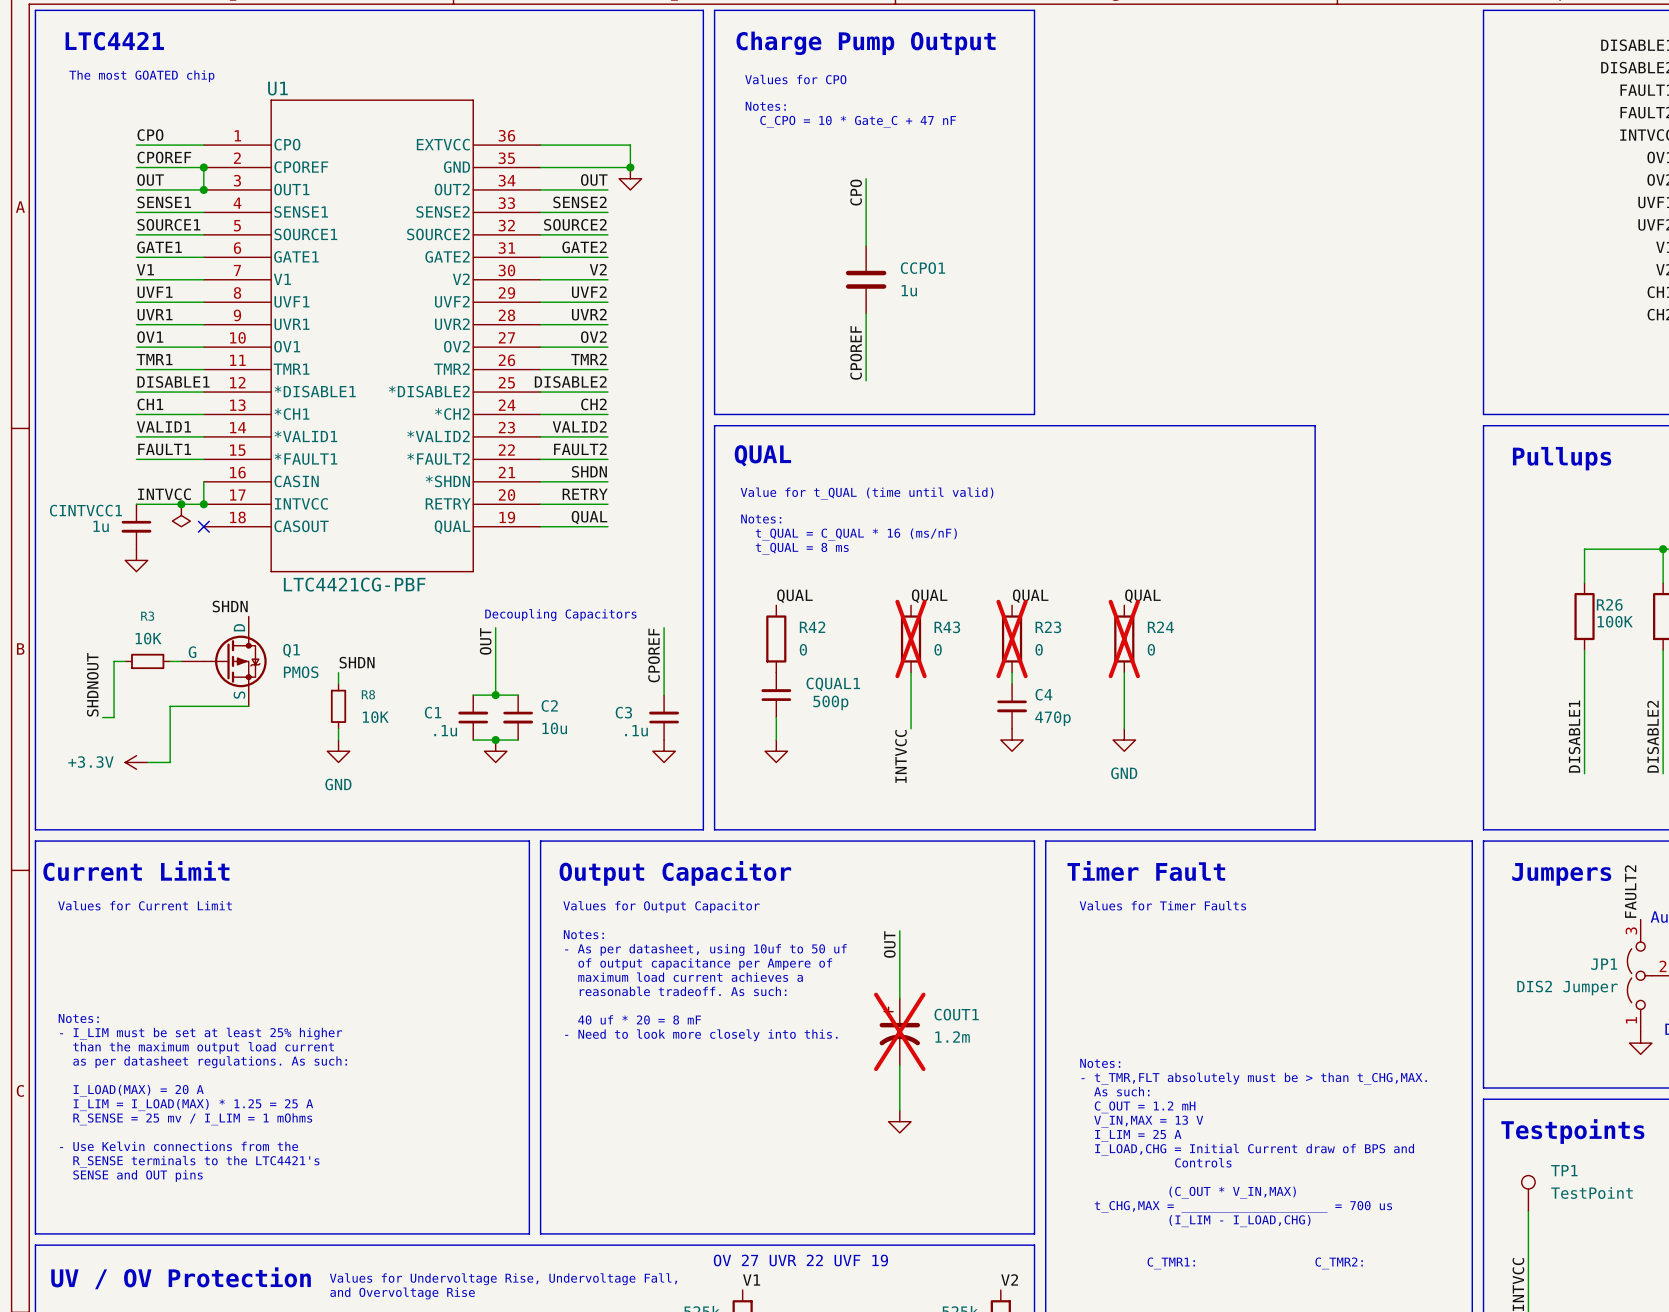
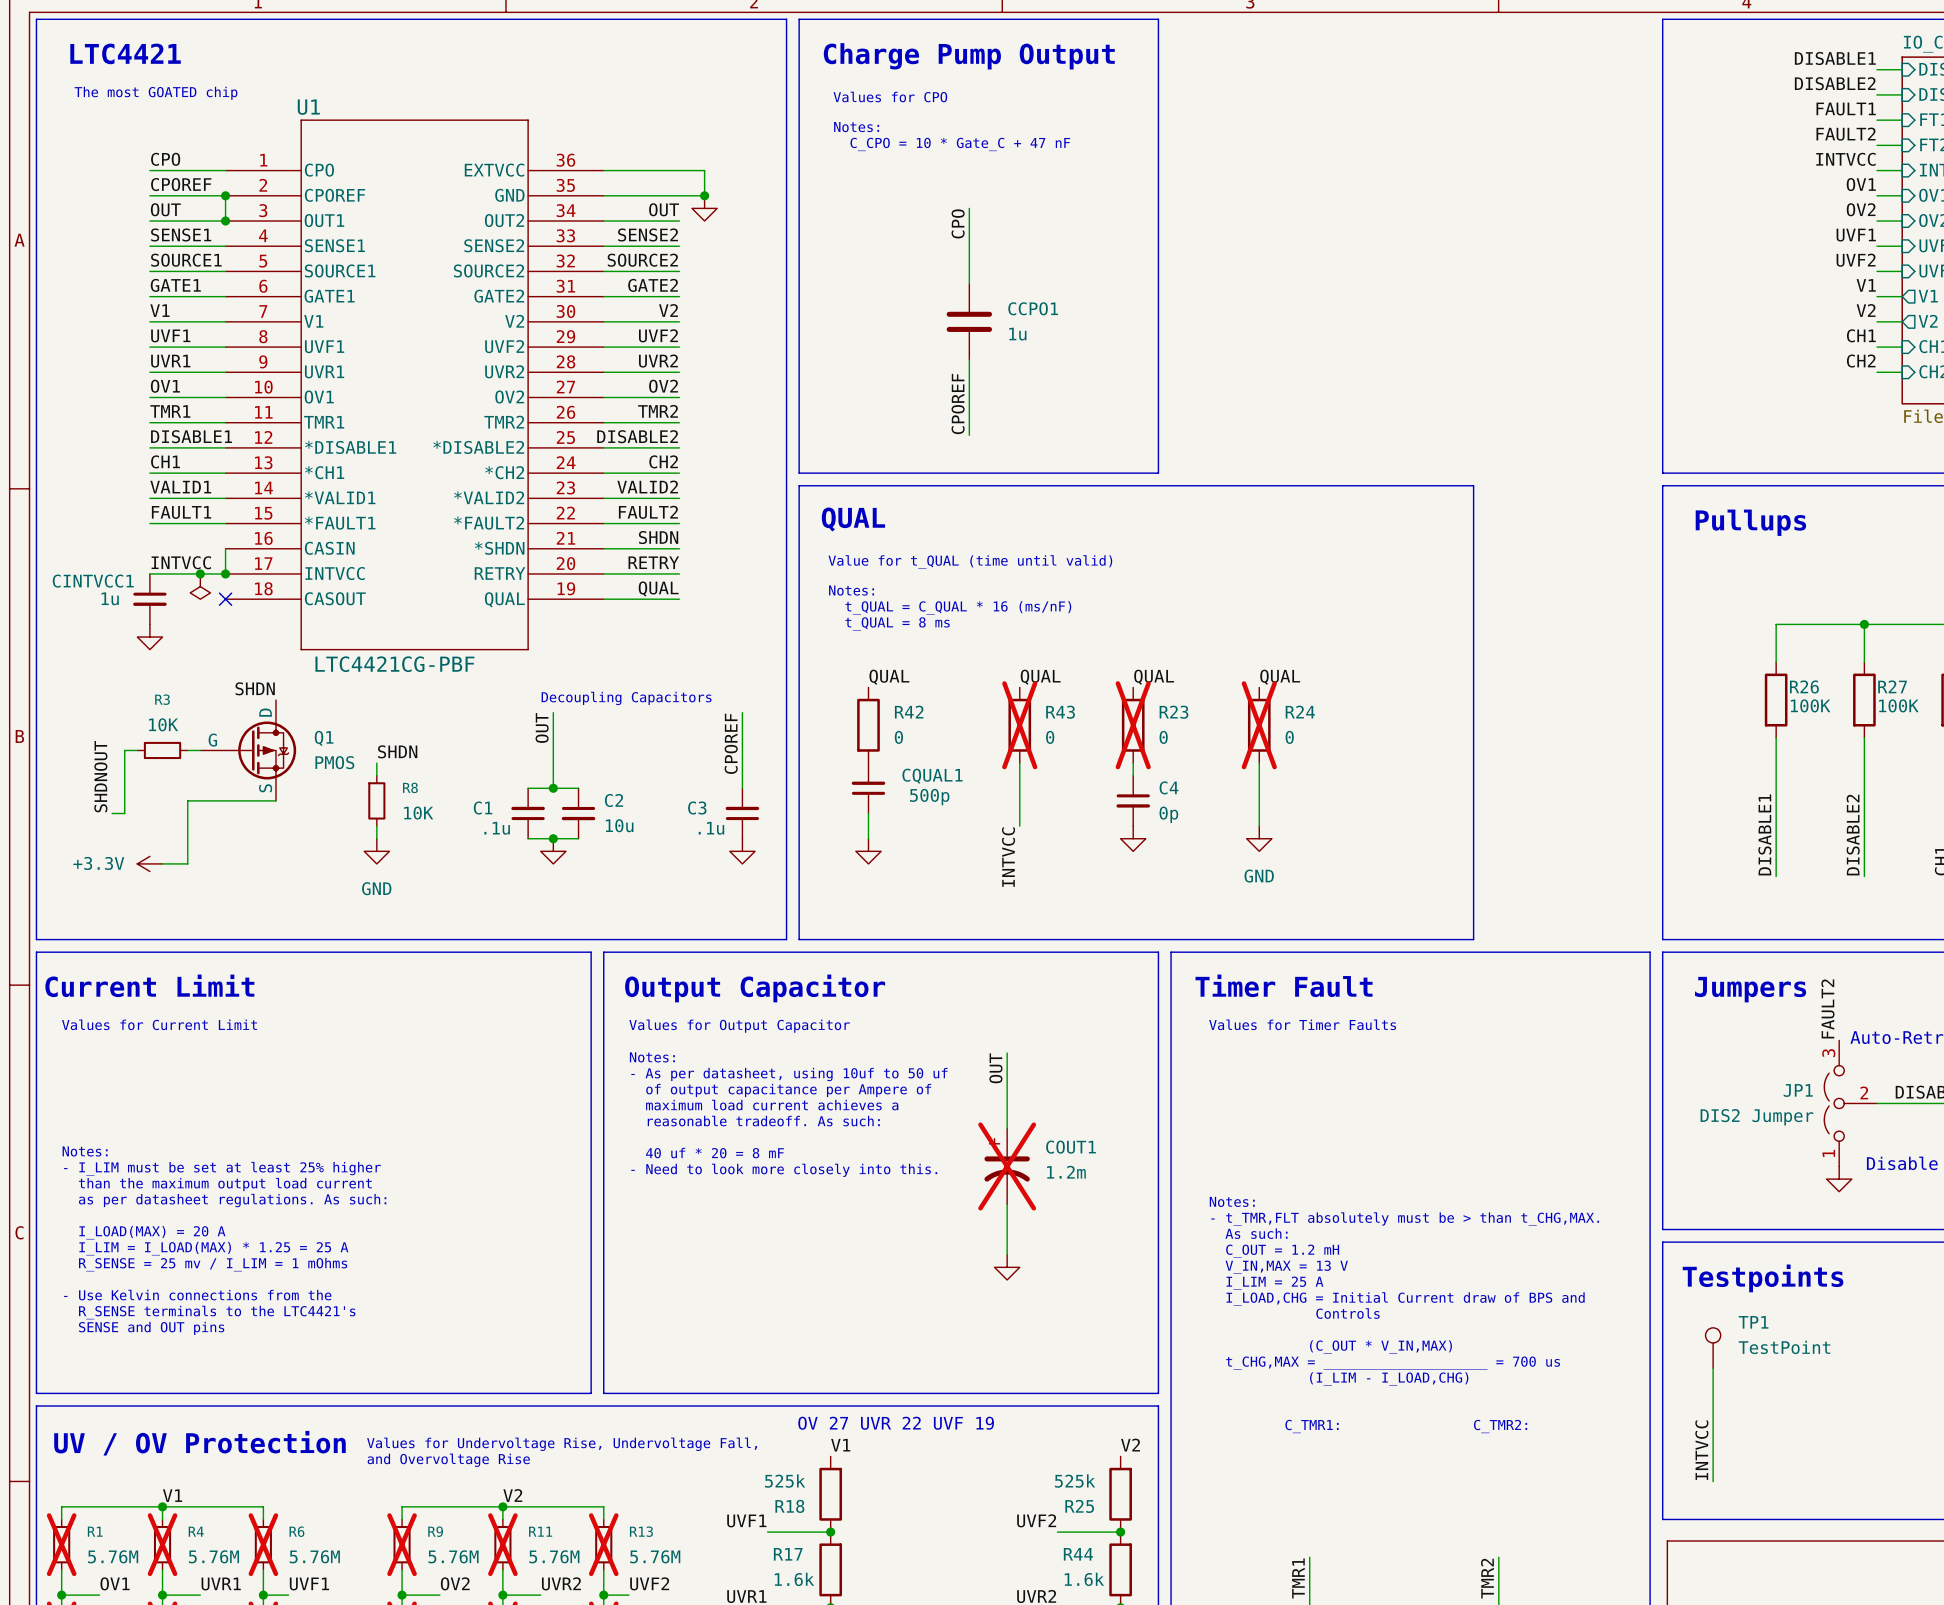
C4 value: 470p (1052, 718) -> 0p (1168, 814)

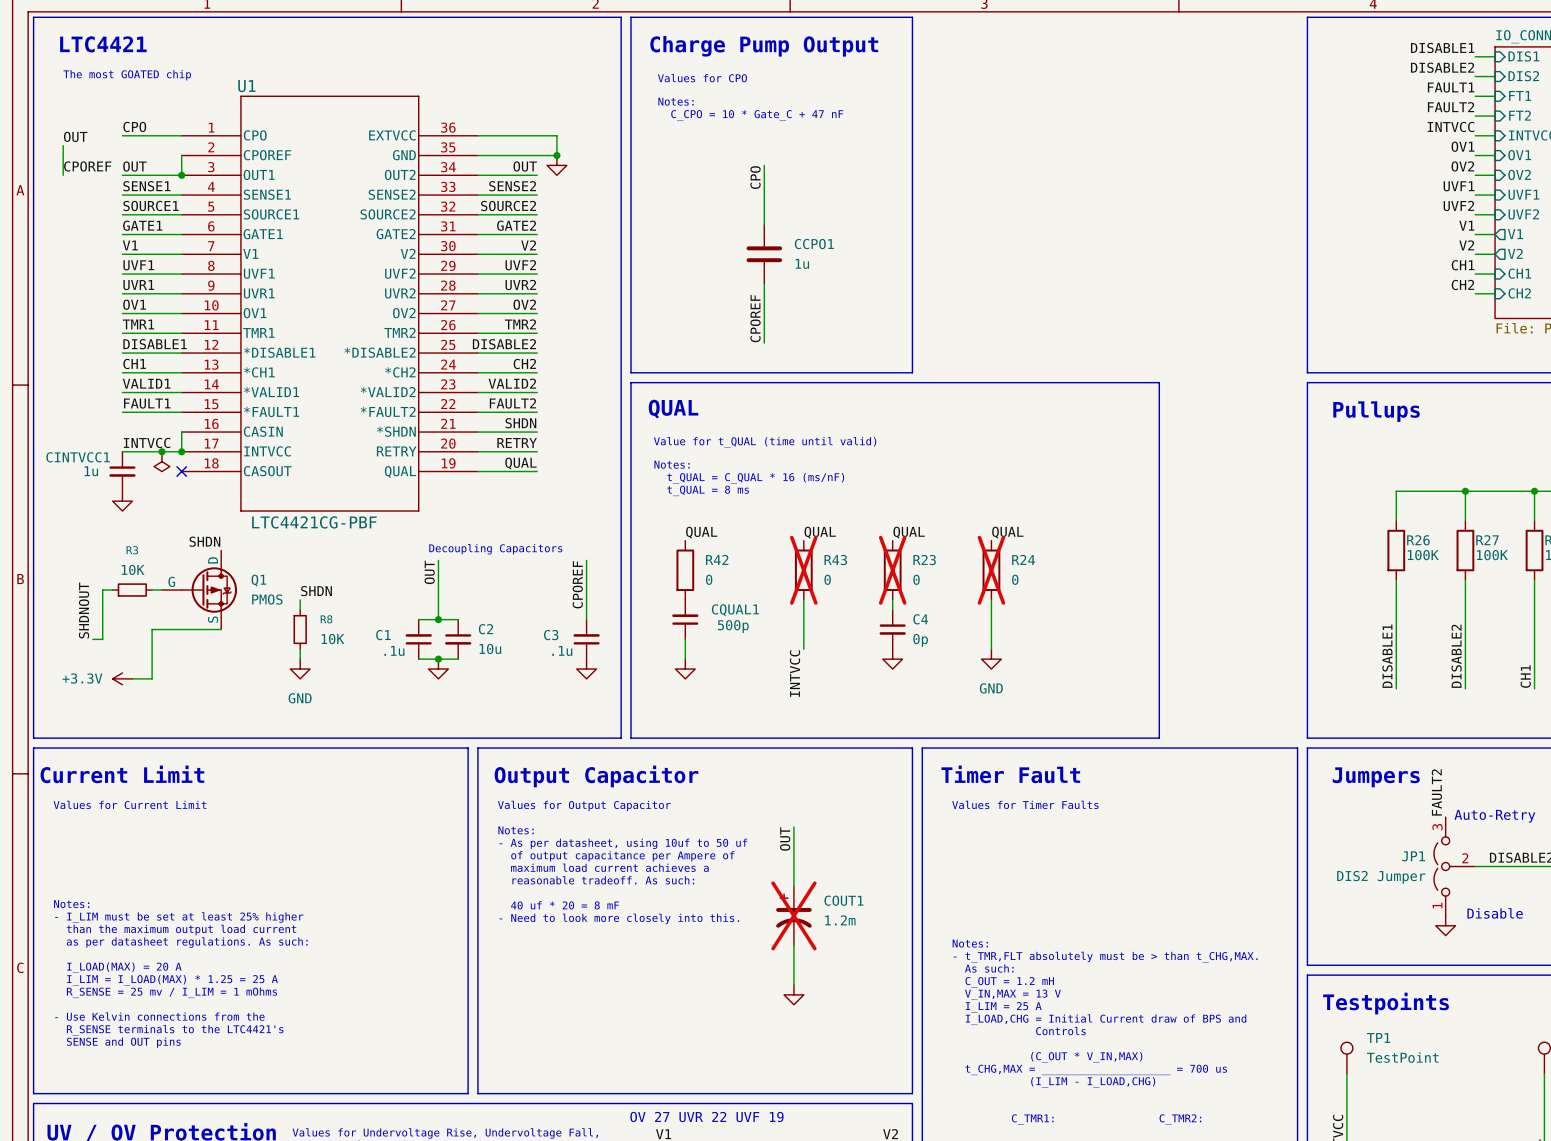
label: none -> OUT (75, 136)
wire: none -> (63, 145) (63, 175)
label position: CPOREF (181, 184) -> CPOREF (87, 166)
wire: (149, 195) (225, 195) -> none
junction: (225, 195) -> none

